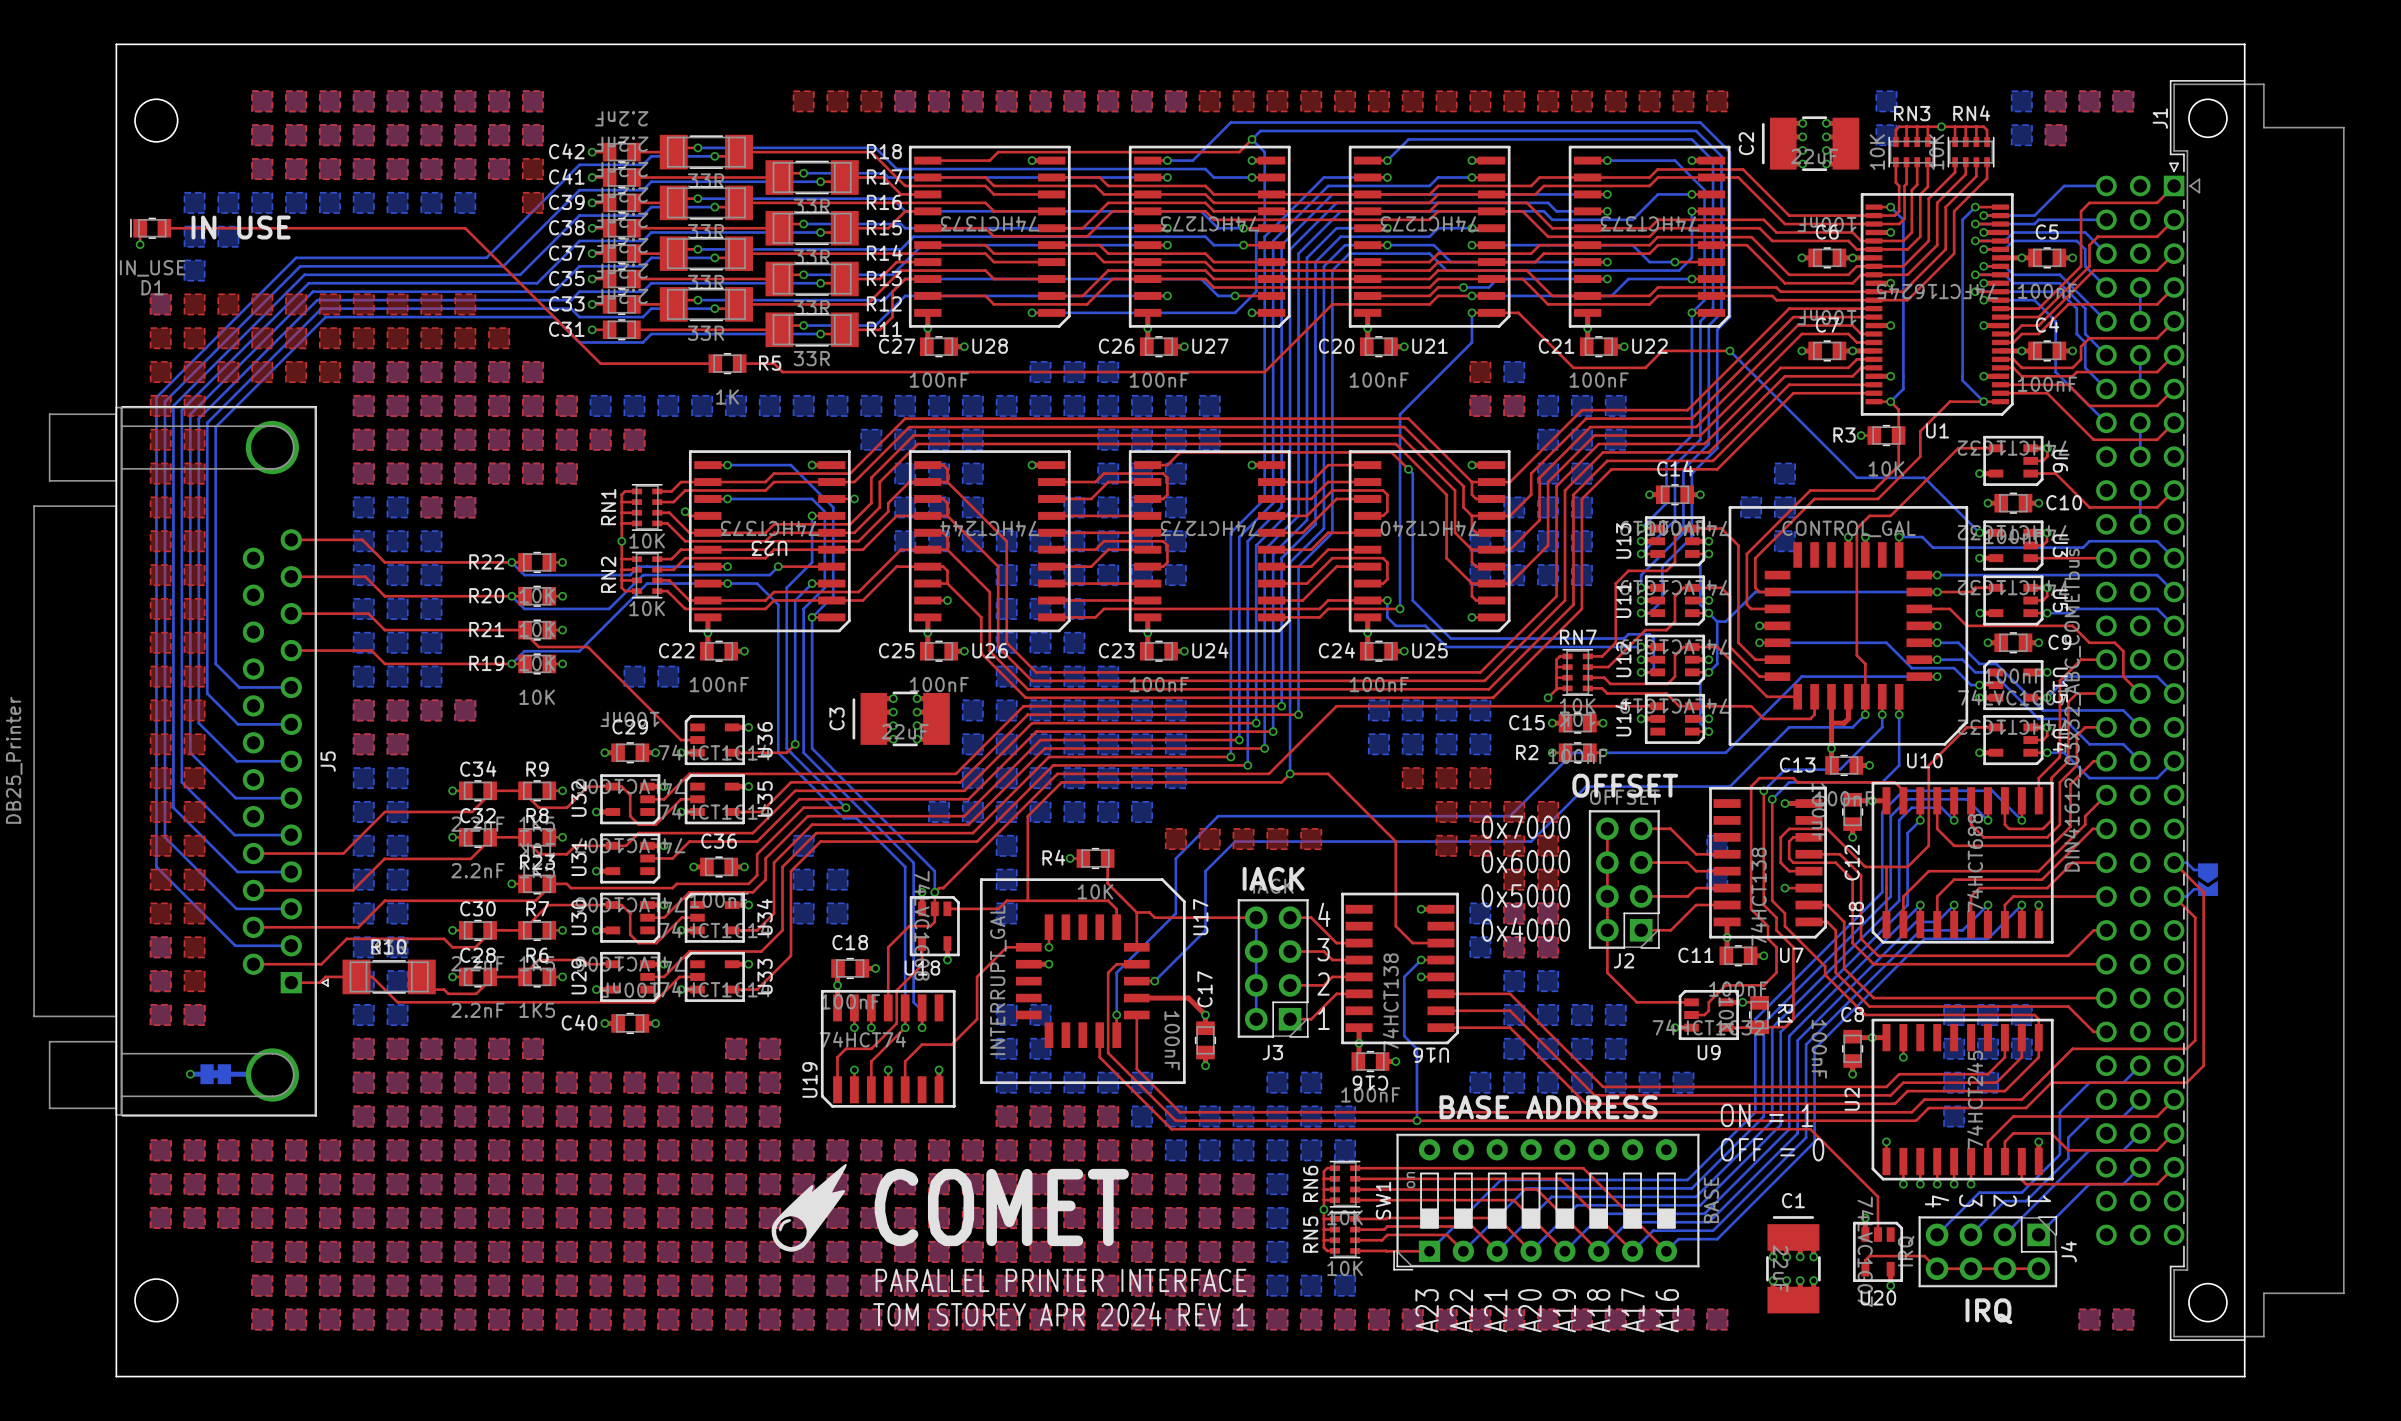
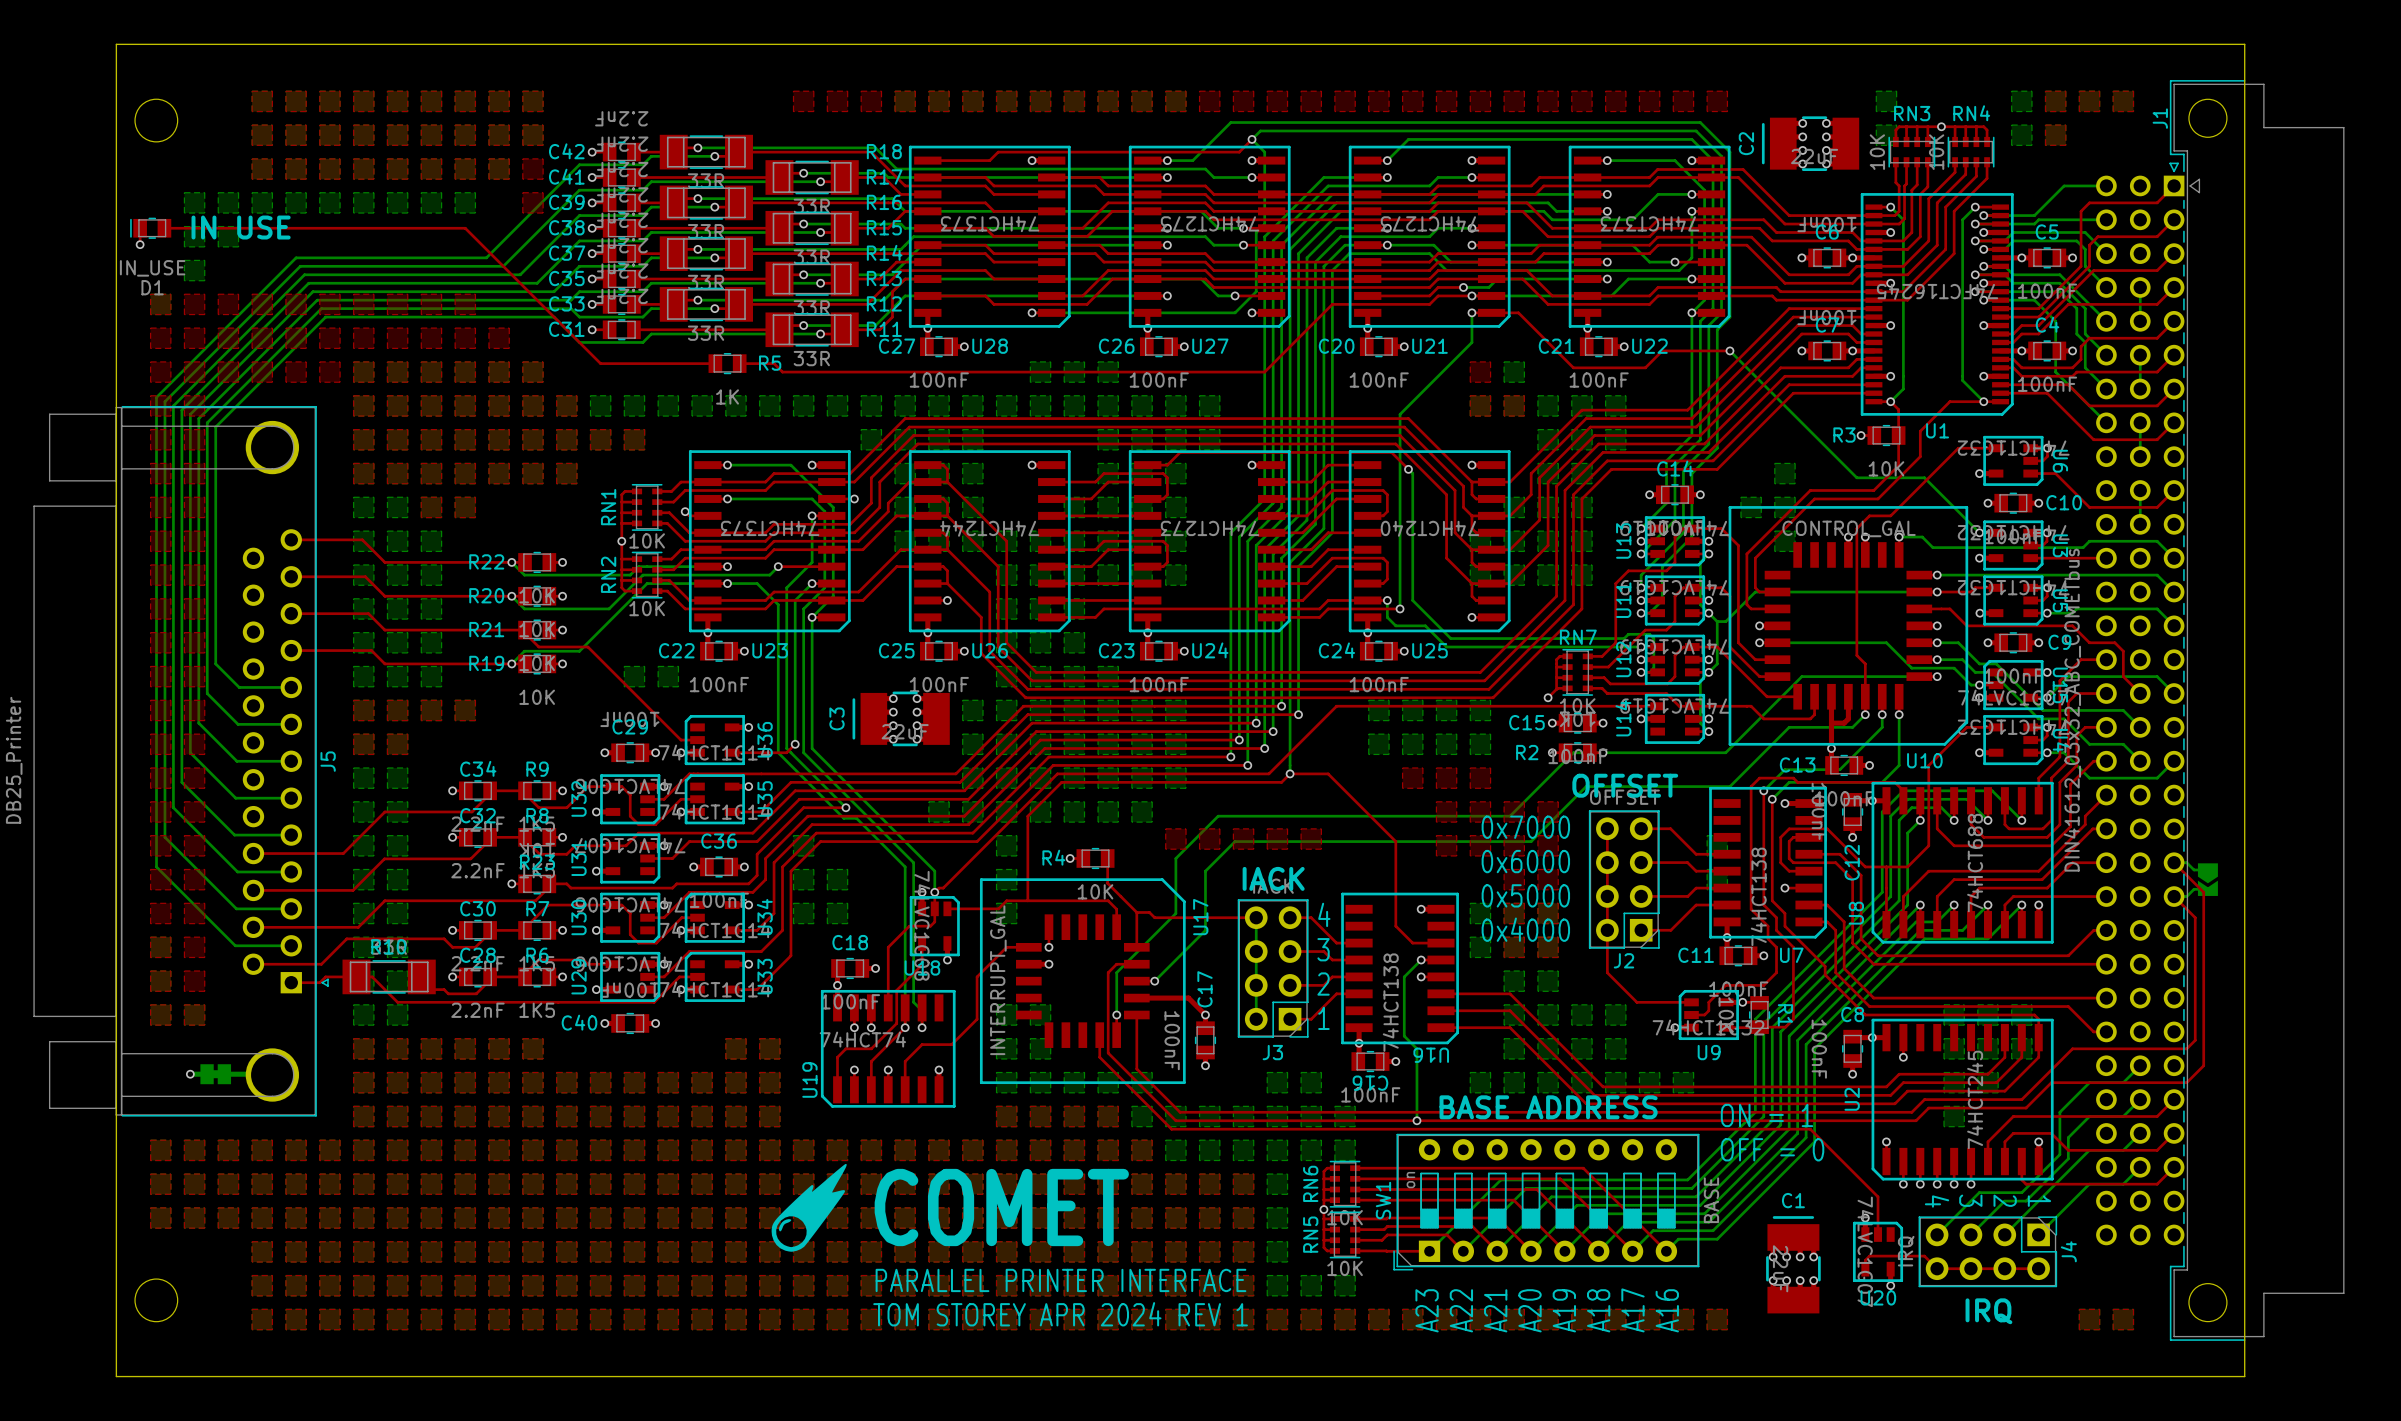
U23 name rotation: 0° (769, 548) -> 180° (770, 650)
U23 name position: U23 (769, 548) -> U23 (770, 650)

